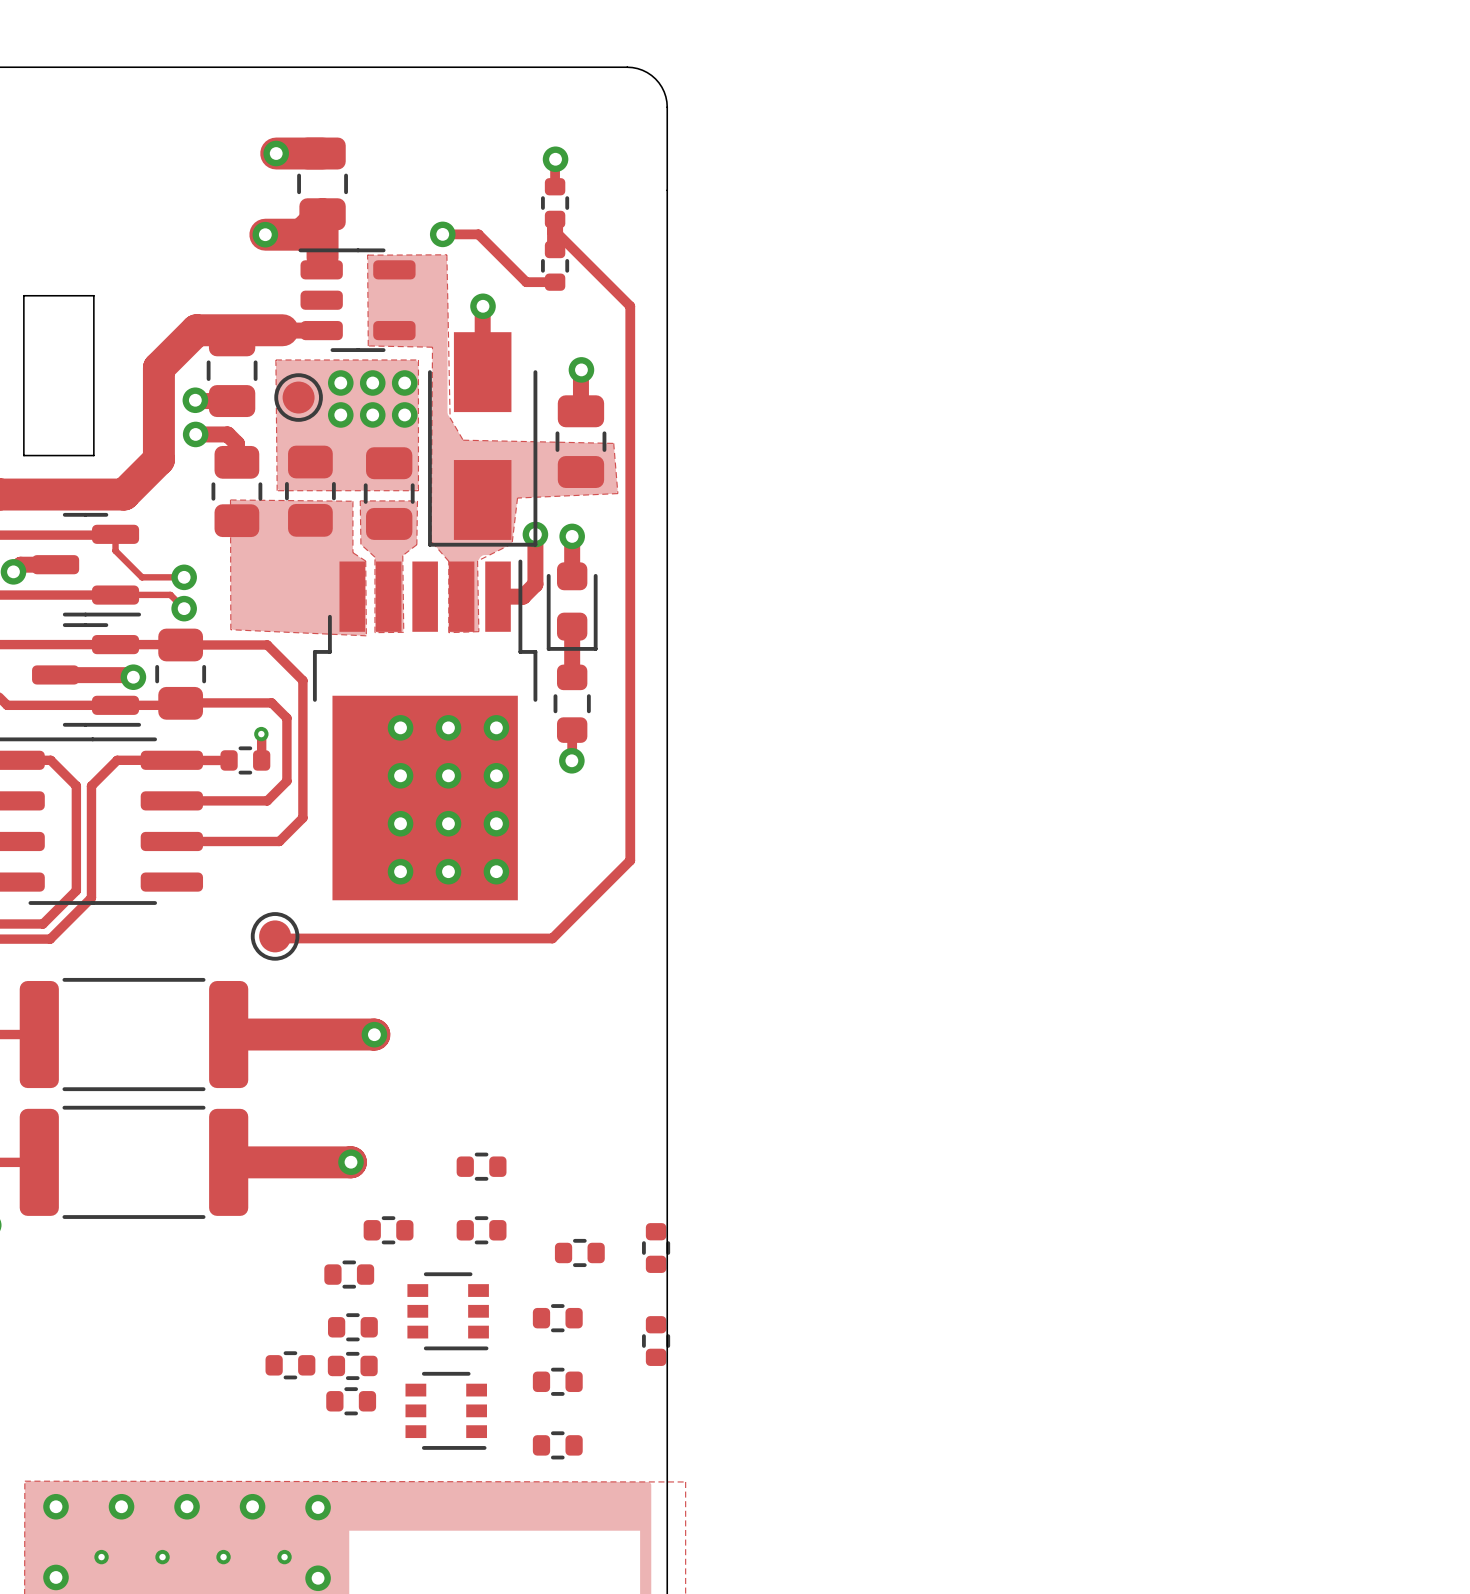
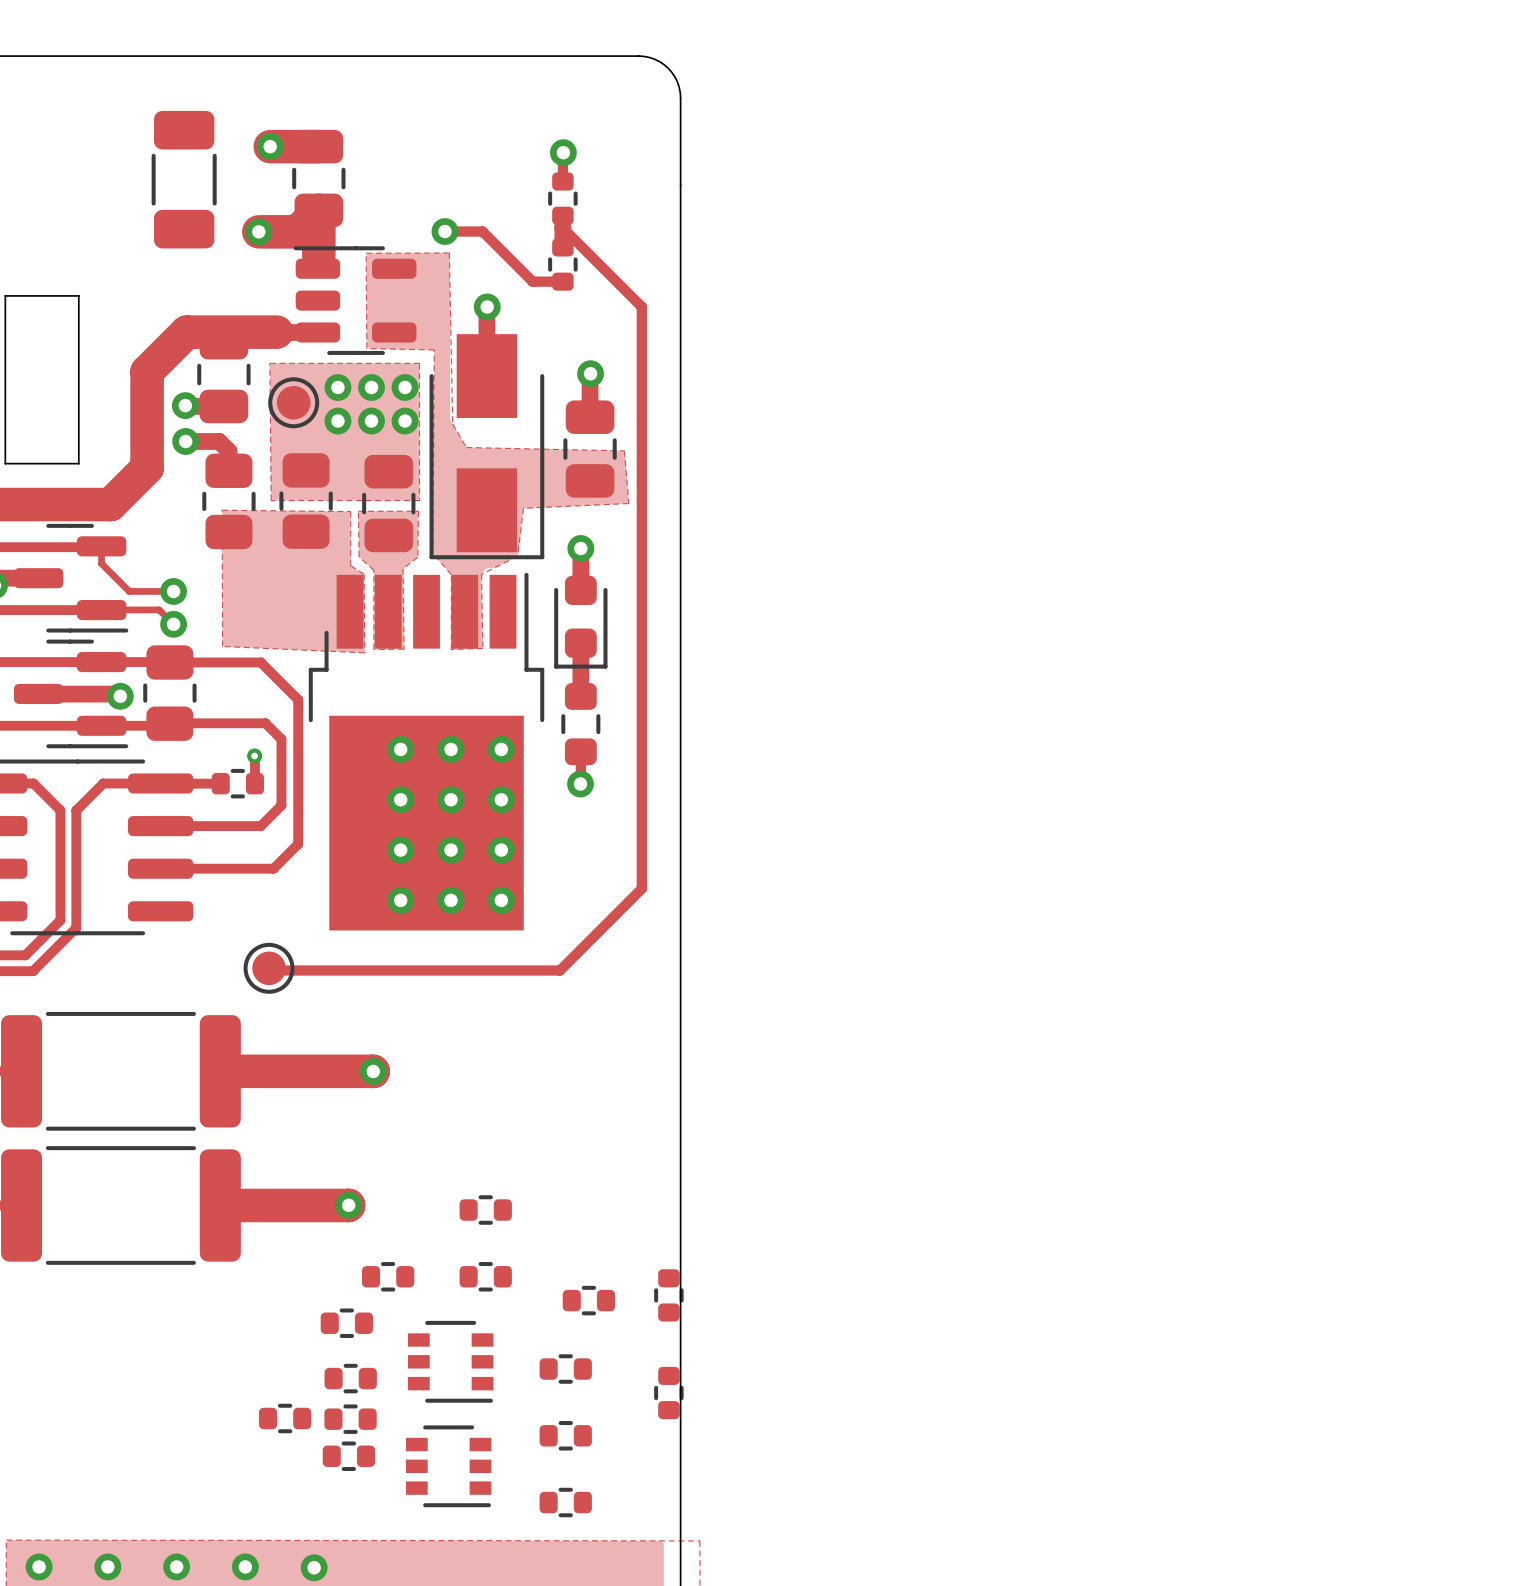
part: none -> (184, 179)
track: (535, 534) (535, 584) (523, 596) (498, 596) -> none
via: (535, 534) -> none

